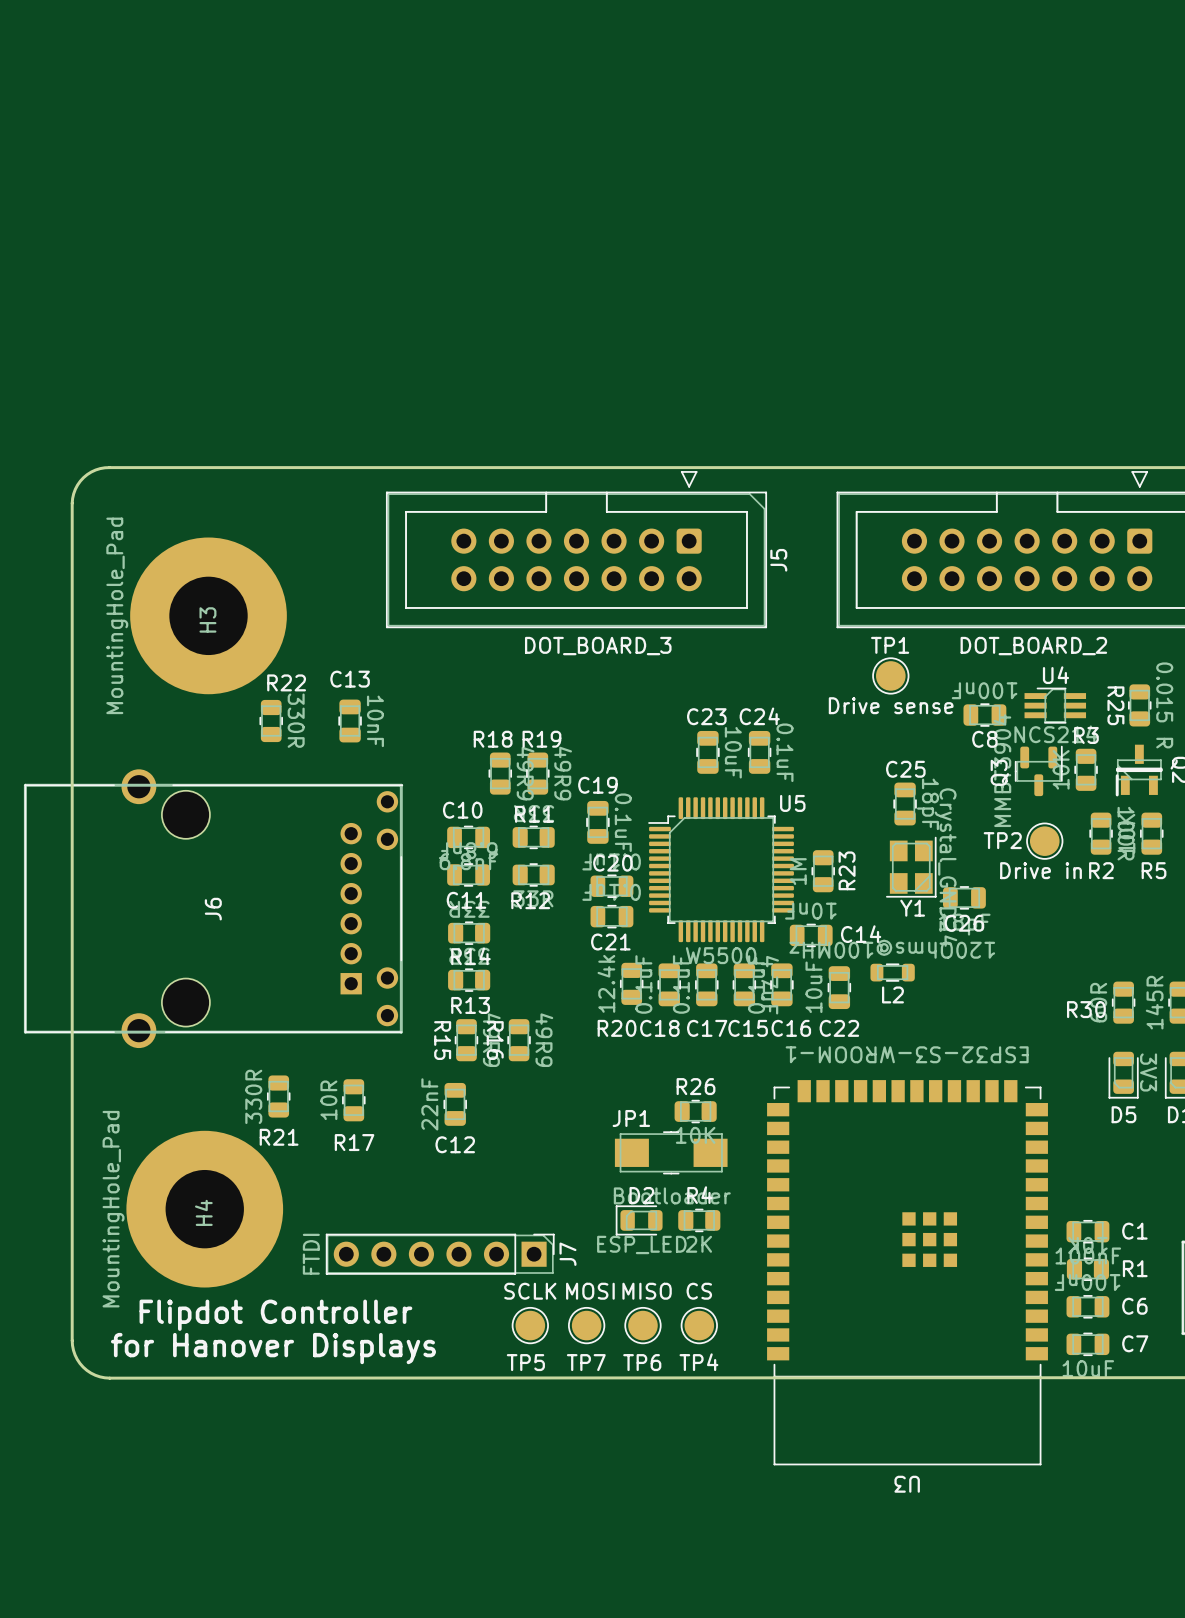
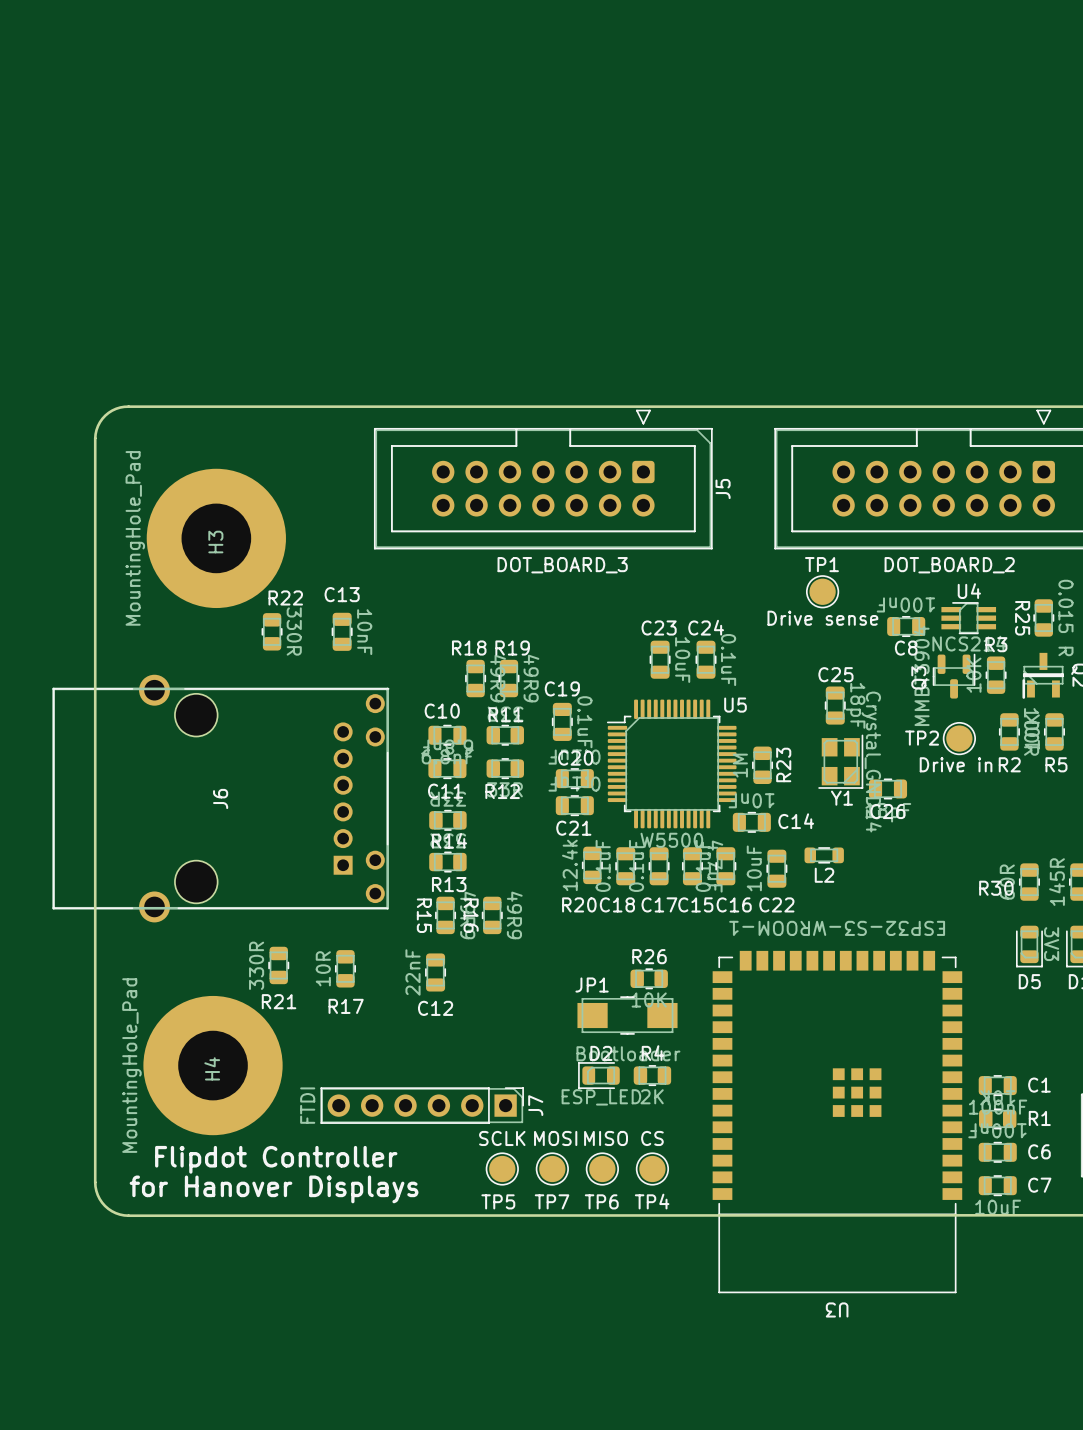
L2 value: 120Ohms@100MHz (892, 949) -> none

